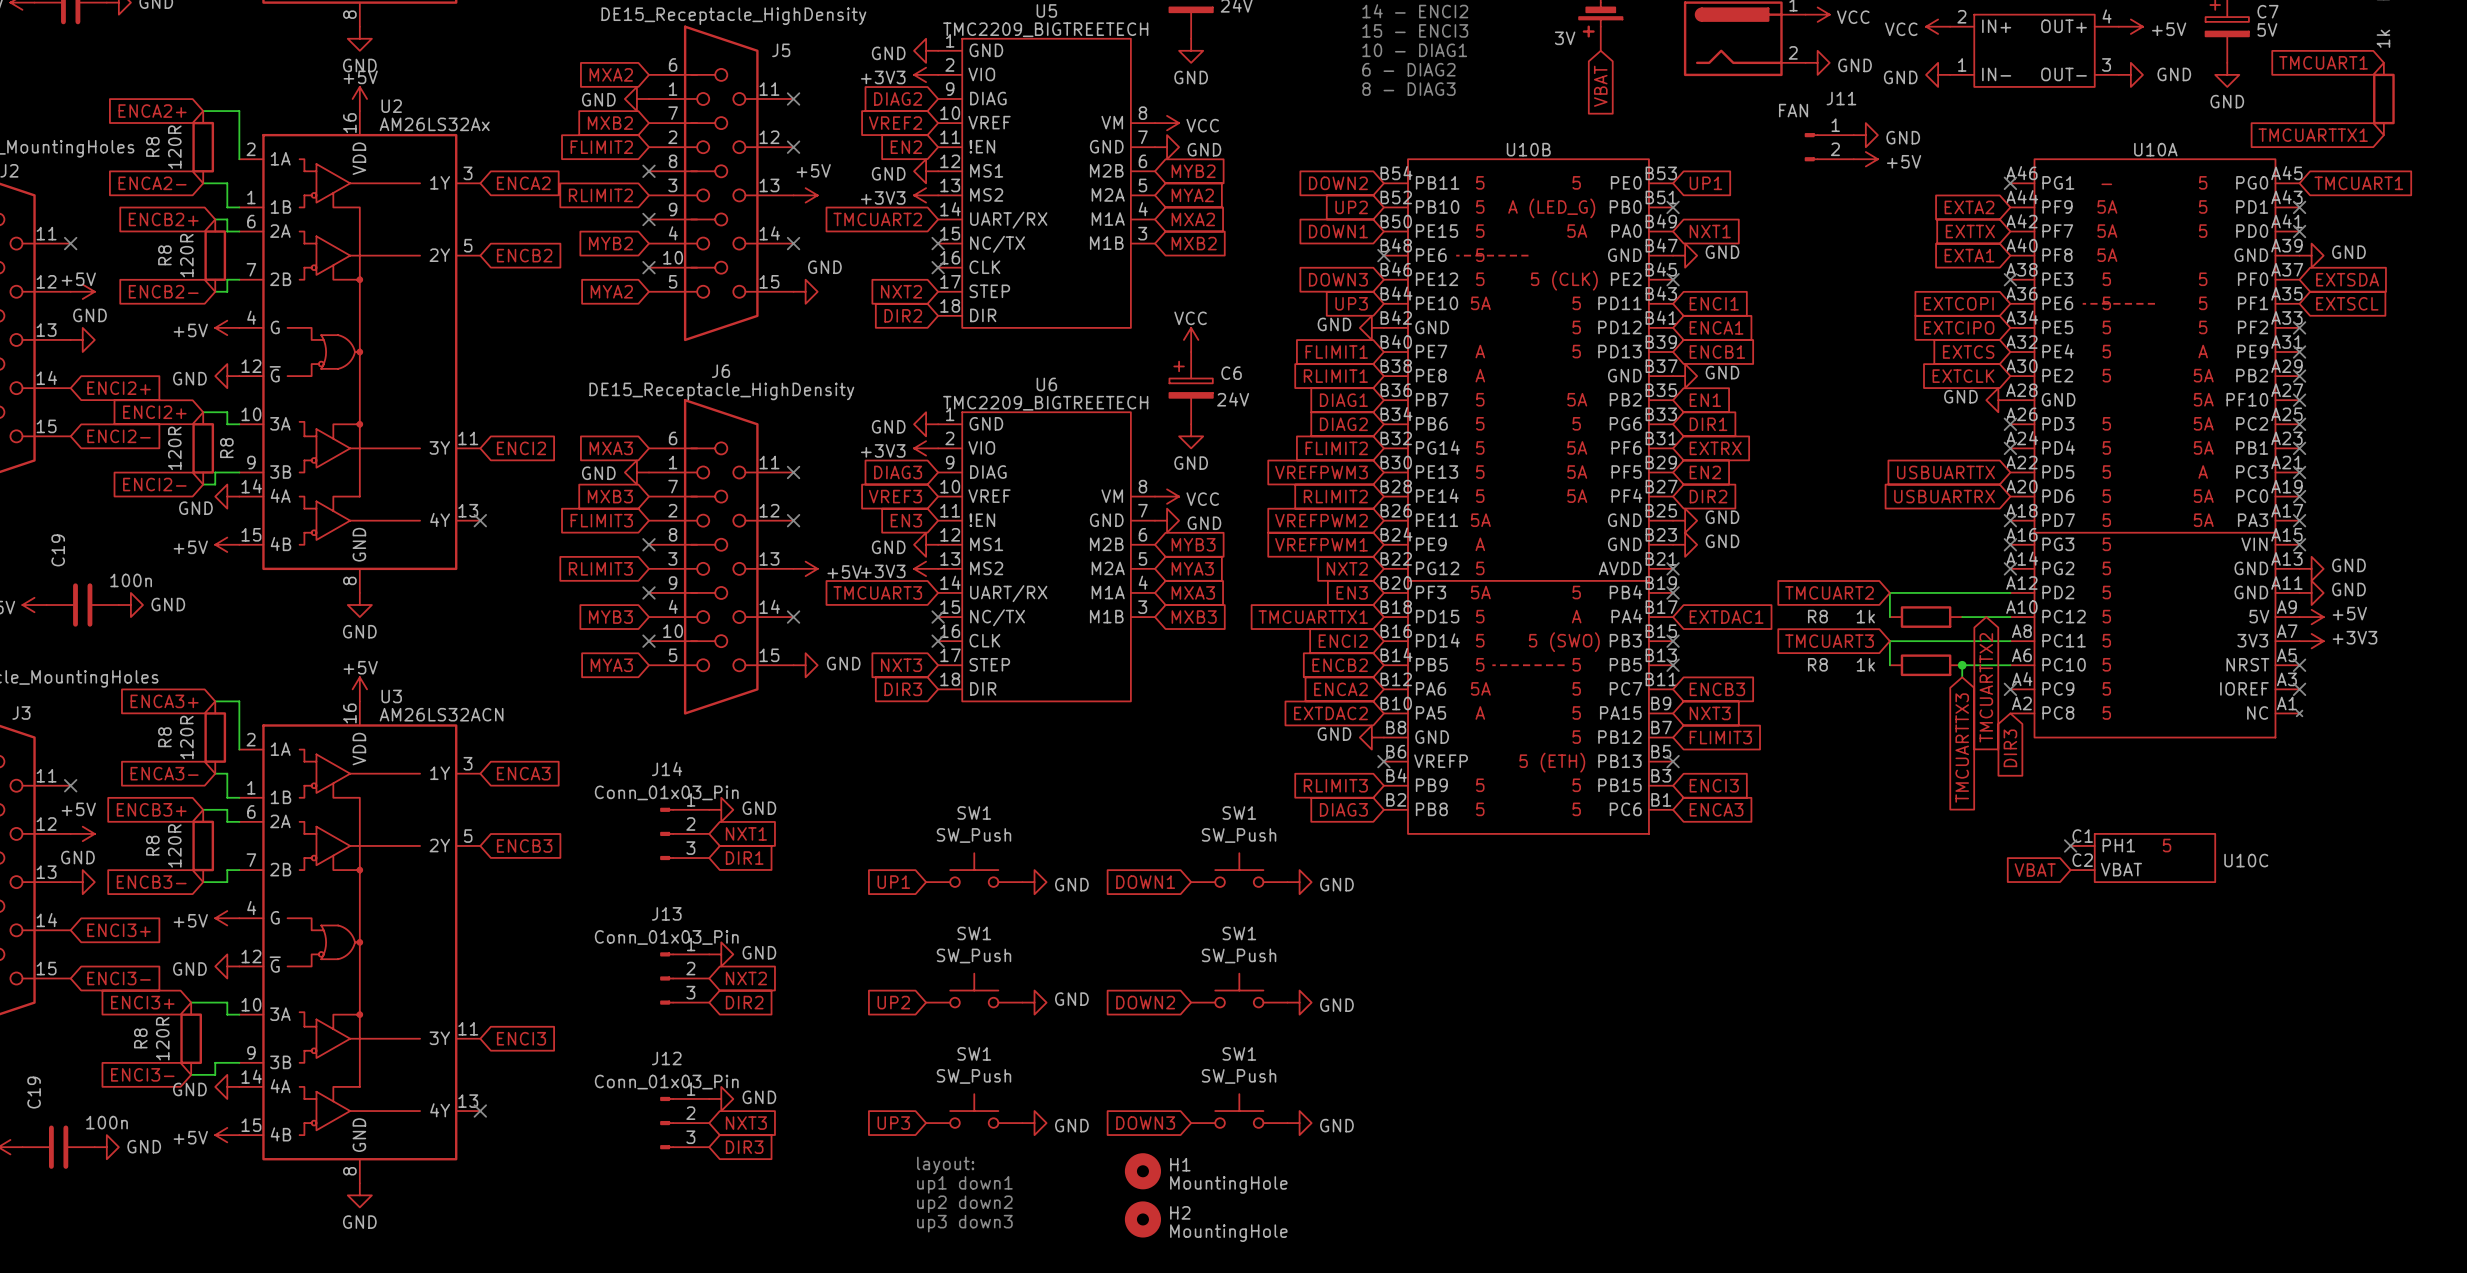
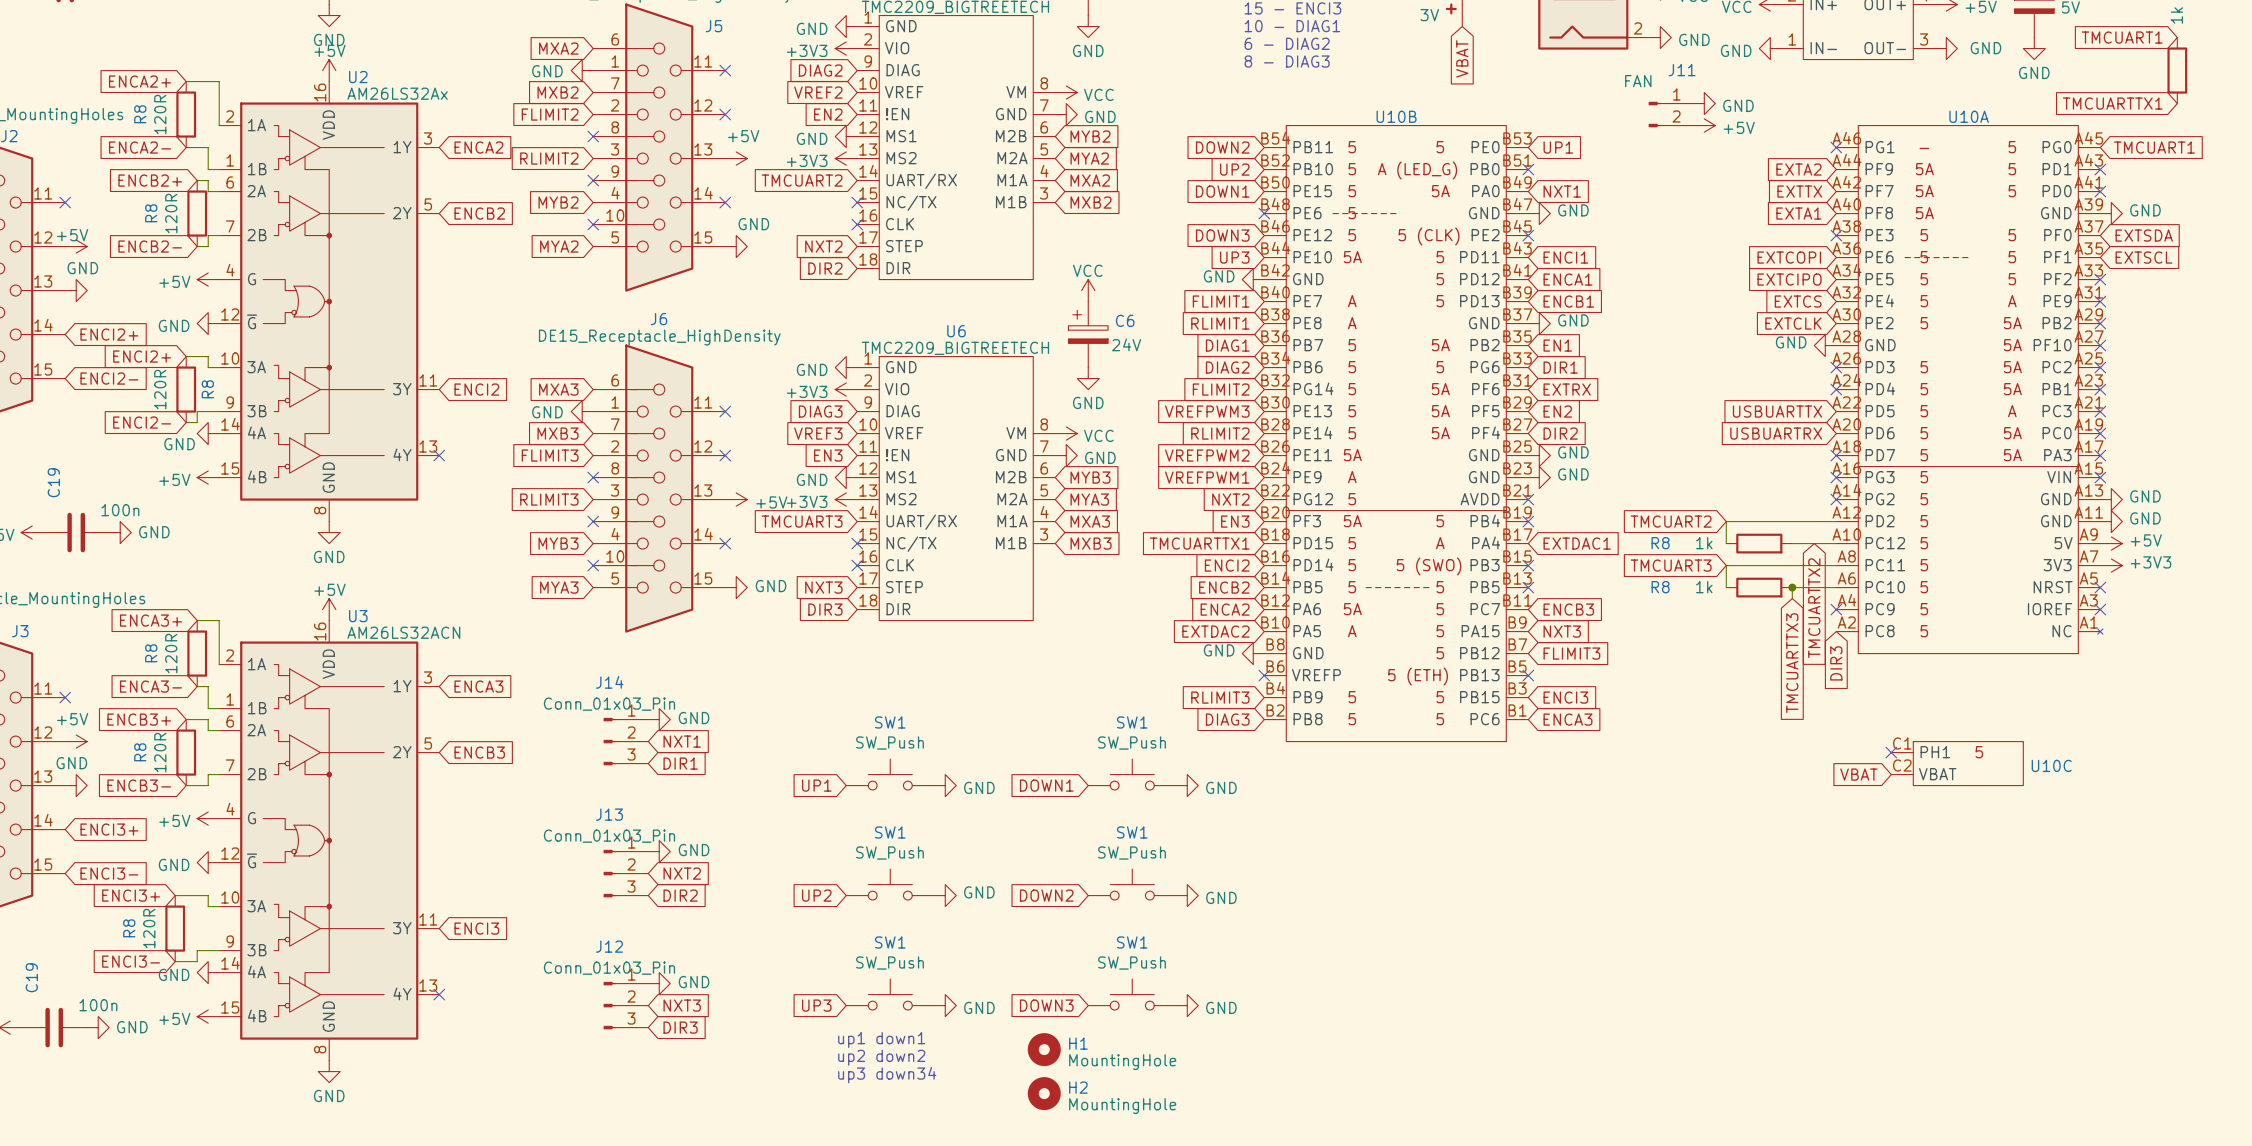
text: layout: (945, 1165) -> up1 down1 (881, 1039)
text: up1 down1 (964, 1184) -> up2 down2 (881, 1057)
text: up2 down2 (964, 1204) -> up3 down34 (887, 1075)
text: up3 down3 (964, 1223) -> none

